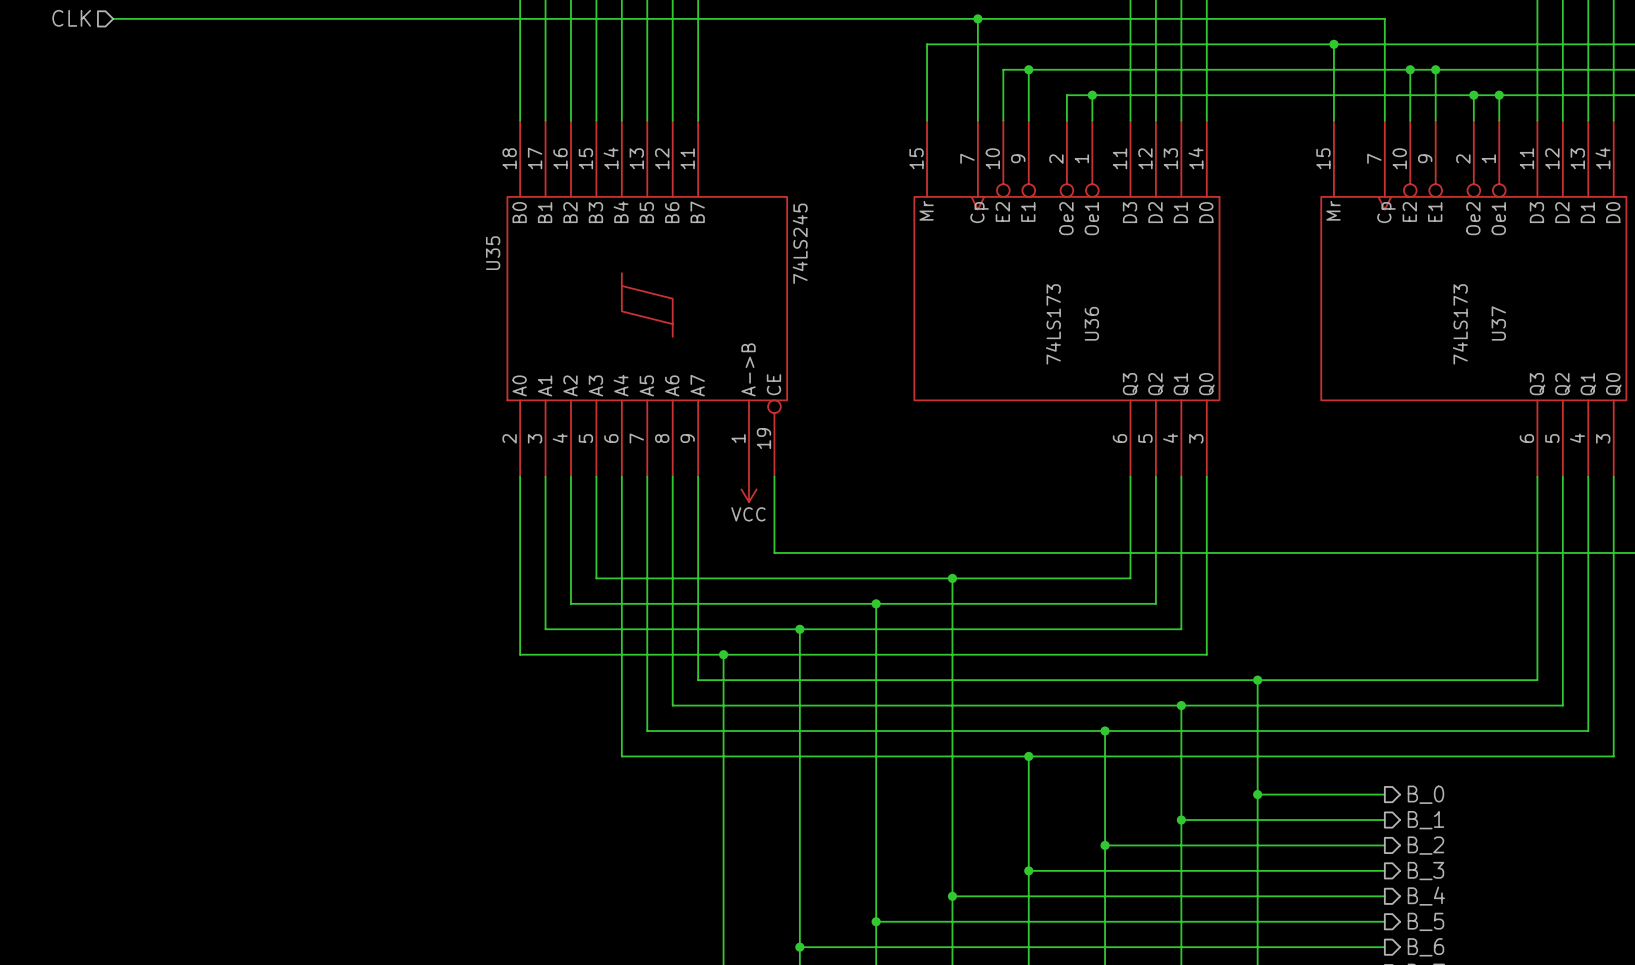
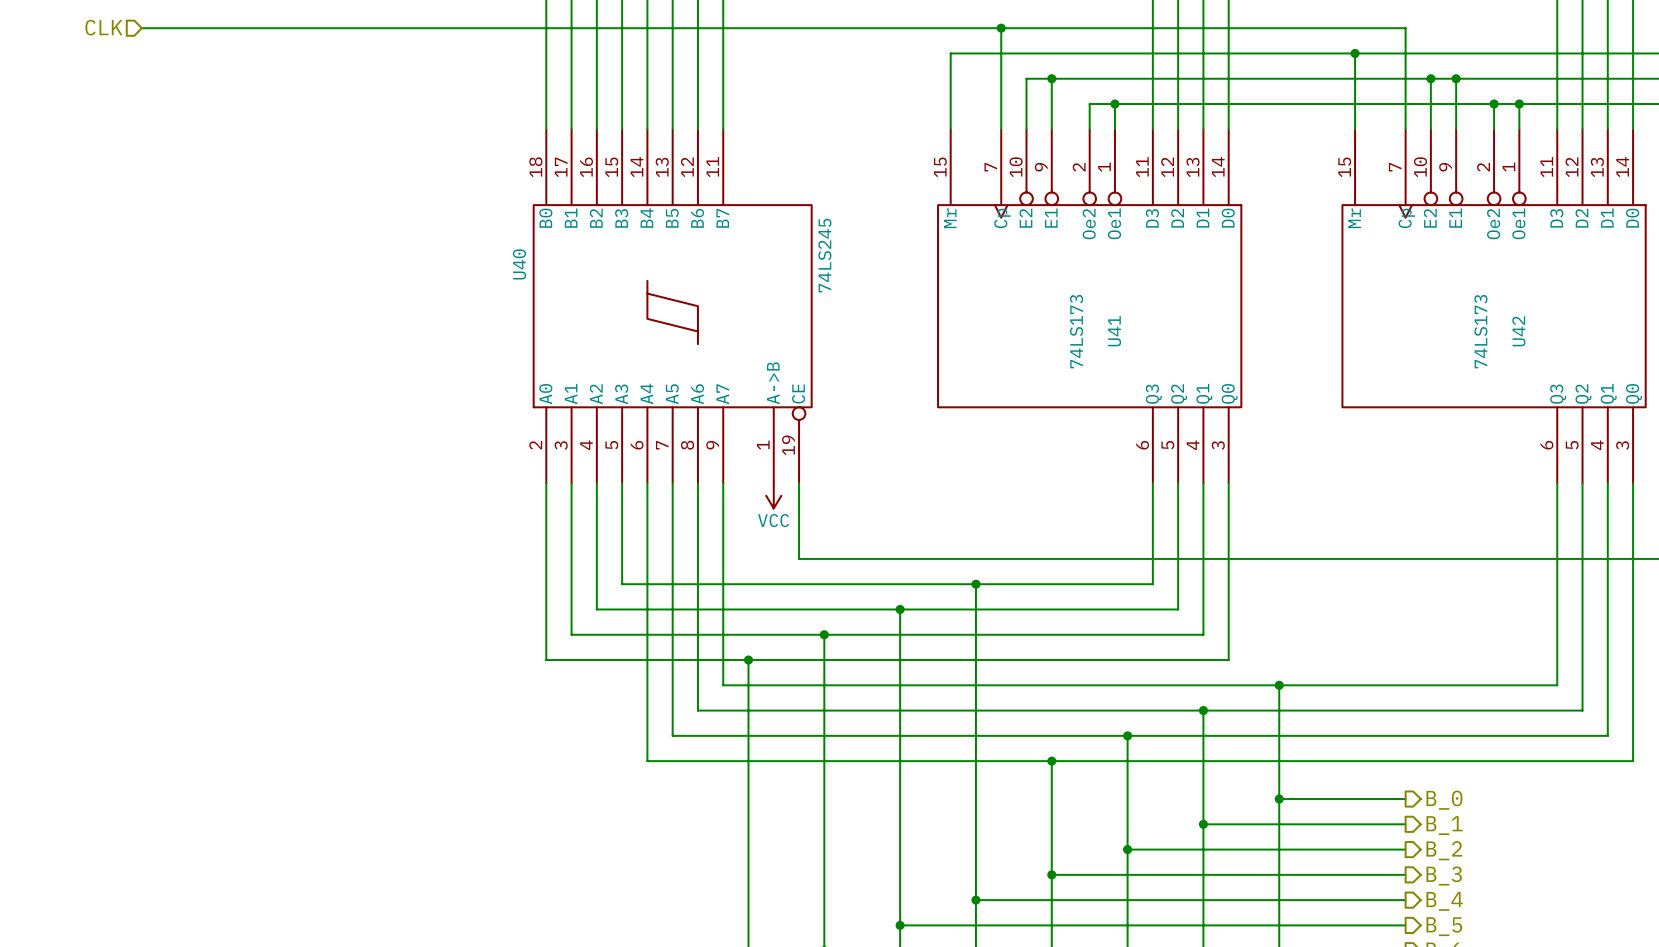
U35 name: U35 (493, 253) -> U40 (519, 264)
U36 name: U36 (1091, 323) -> U41 (1114, 331)
U37 name: U37 (1498, 323) -> U42 (1518, 331)

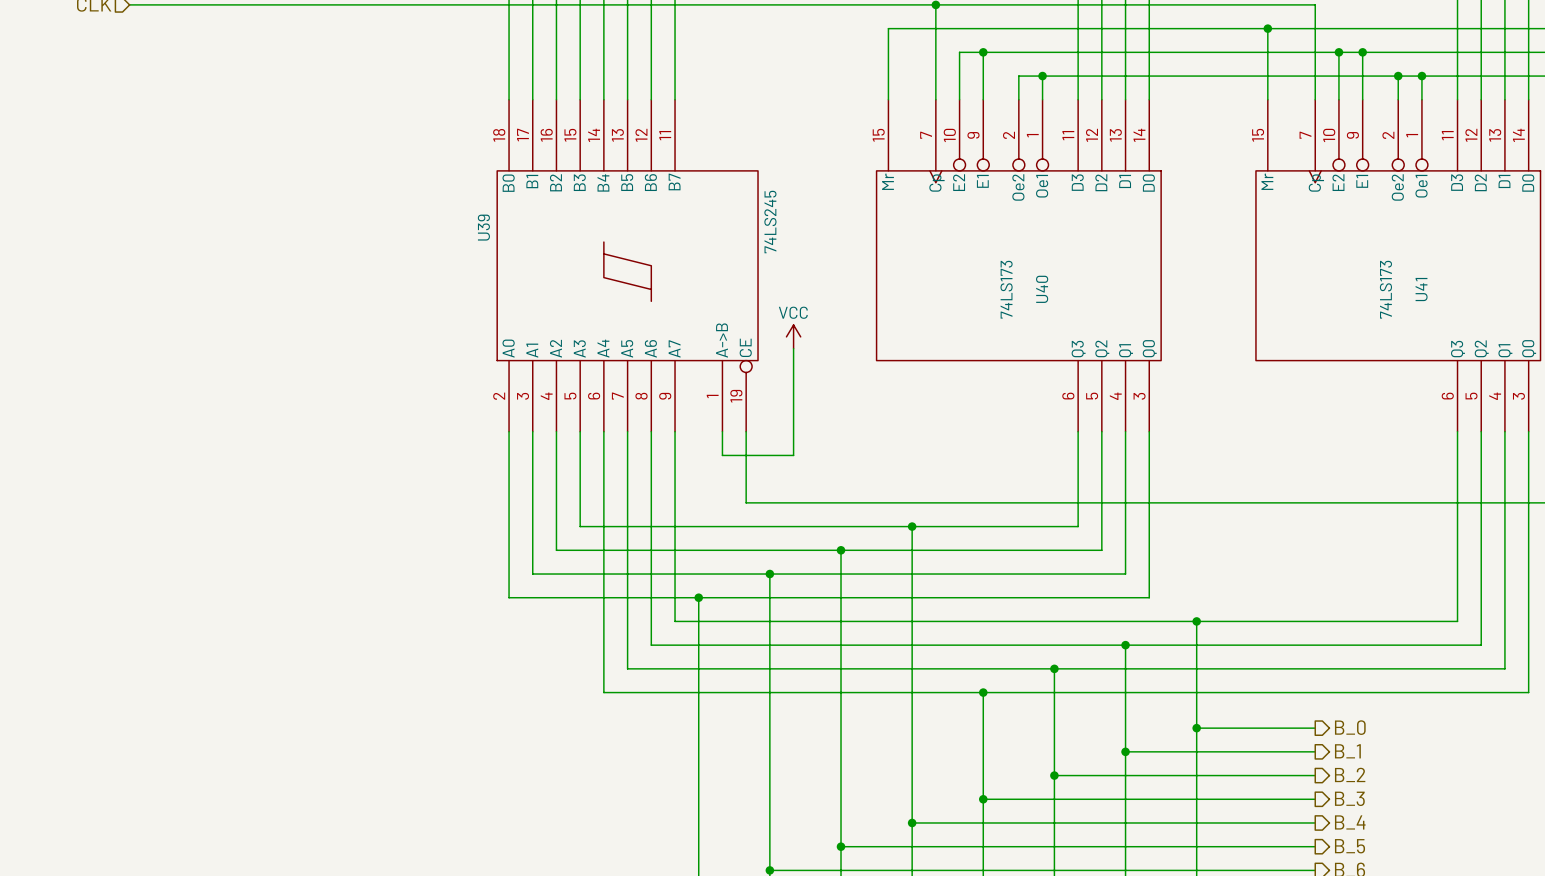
U40 name: U40 (519, 264) -> U39 (483, 227)
U41 name: U41 (1114, 331) -> U40 (1042, 289)
U42 name: U42 (1518, 331) -> U41 (1421, 289)
wire: none -> (793, 348) (793, 455) (722, 455) (722, 431)
power symbol rotation: 0° (773, 495) -> 180° (793, 336)
power symbol position: VCC (773, 495) -> VCC (793, 336)

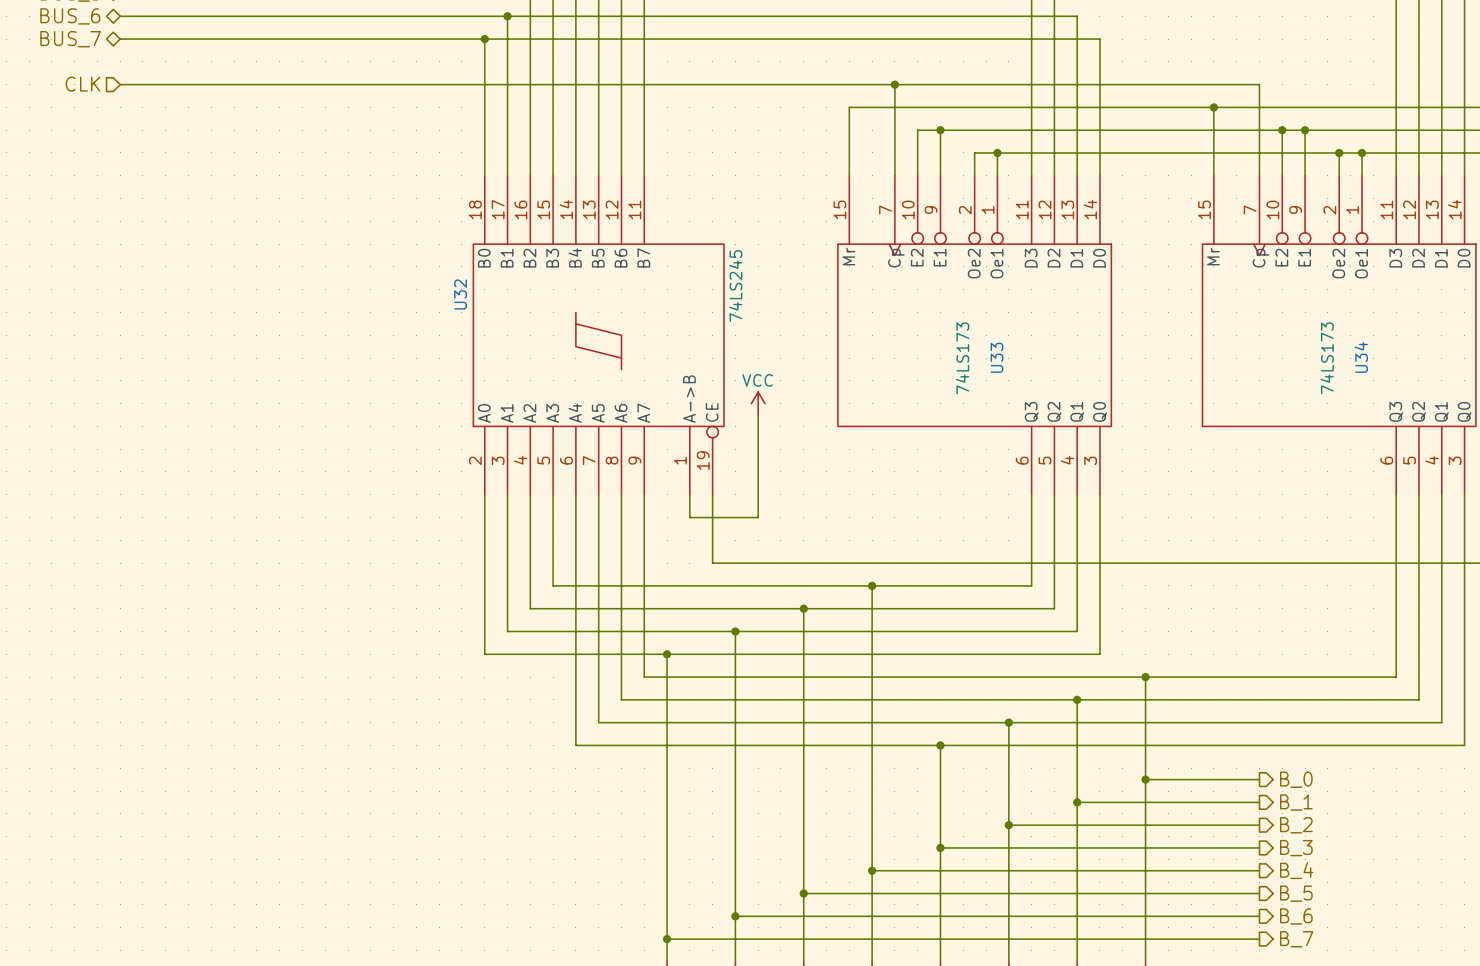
U39 name: U39 (483, 227) -> U32 (460, 294)
U40 name: U40 (1042, 289) -> U33 (997, 357)
U41 name: U41 (1421, 289) -> U34 (1361, 357)

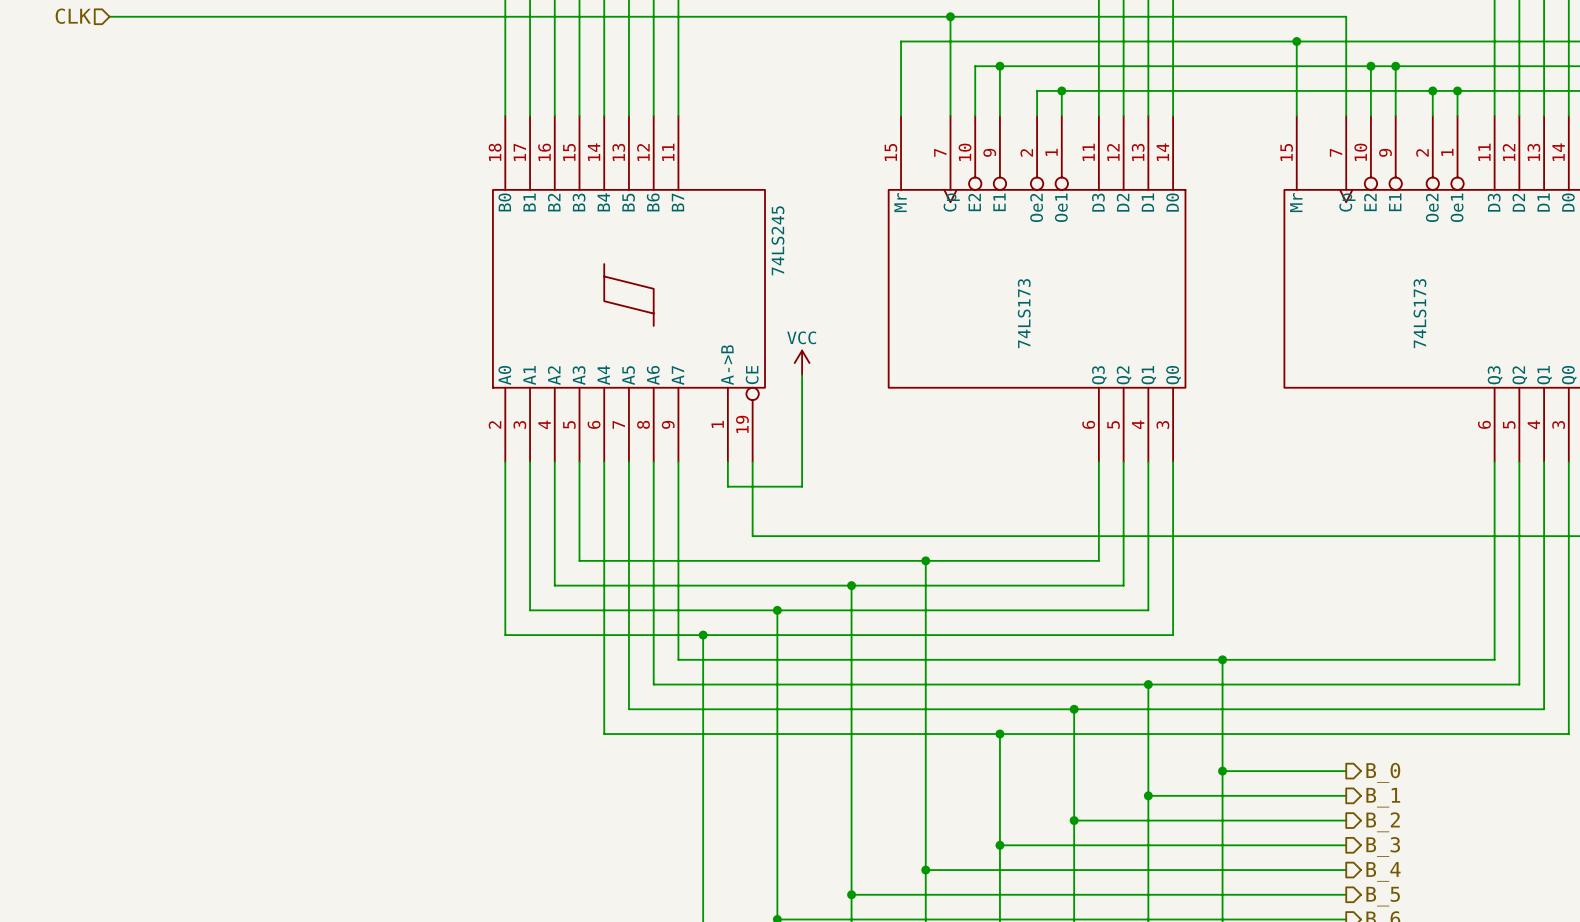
U32 name: U32 (460, 294) -> none
U33 name: U33 (997, 357) -> none
U34 name: U34 (1361, 357) -> none

